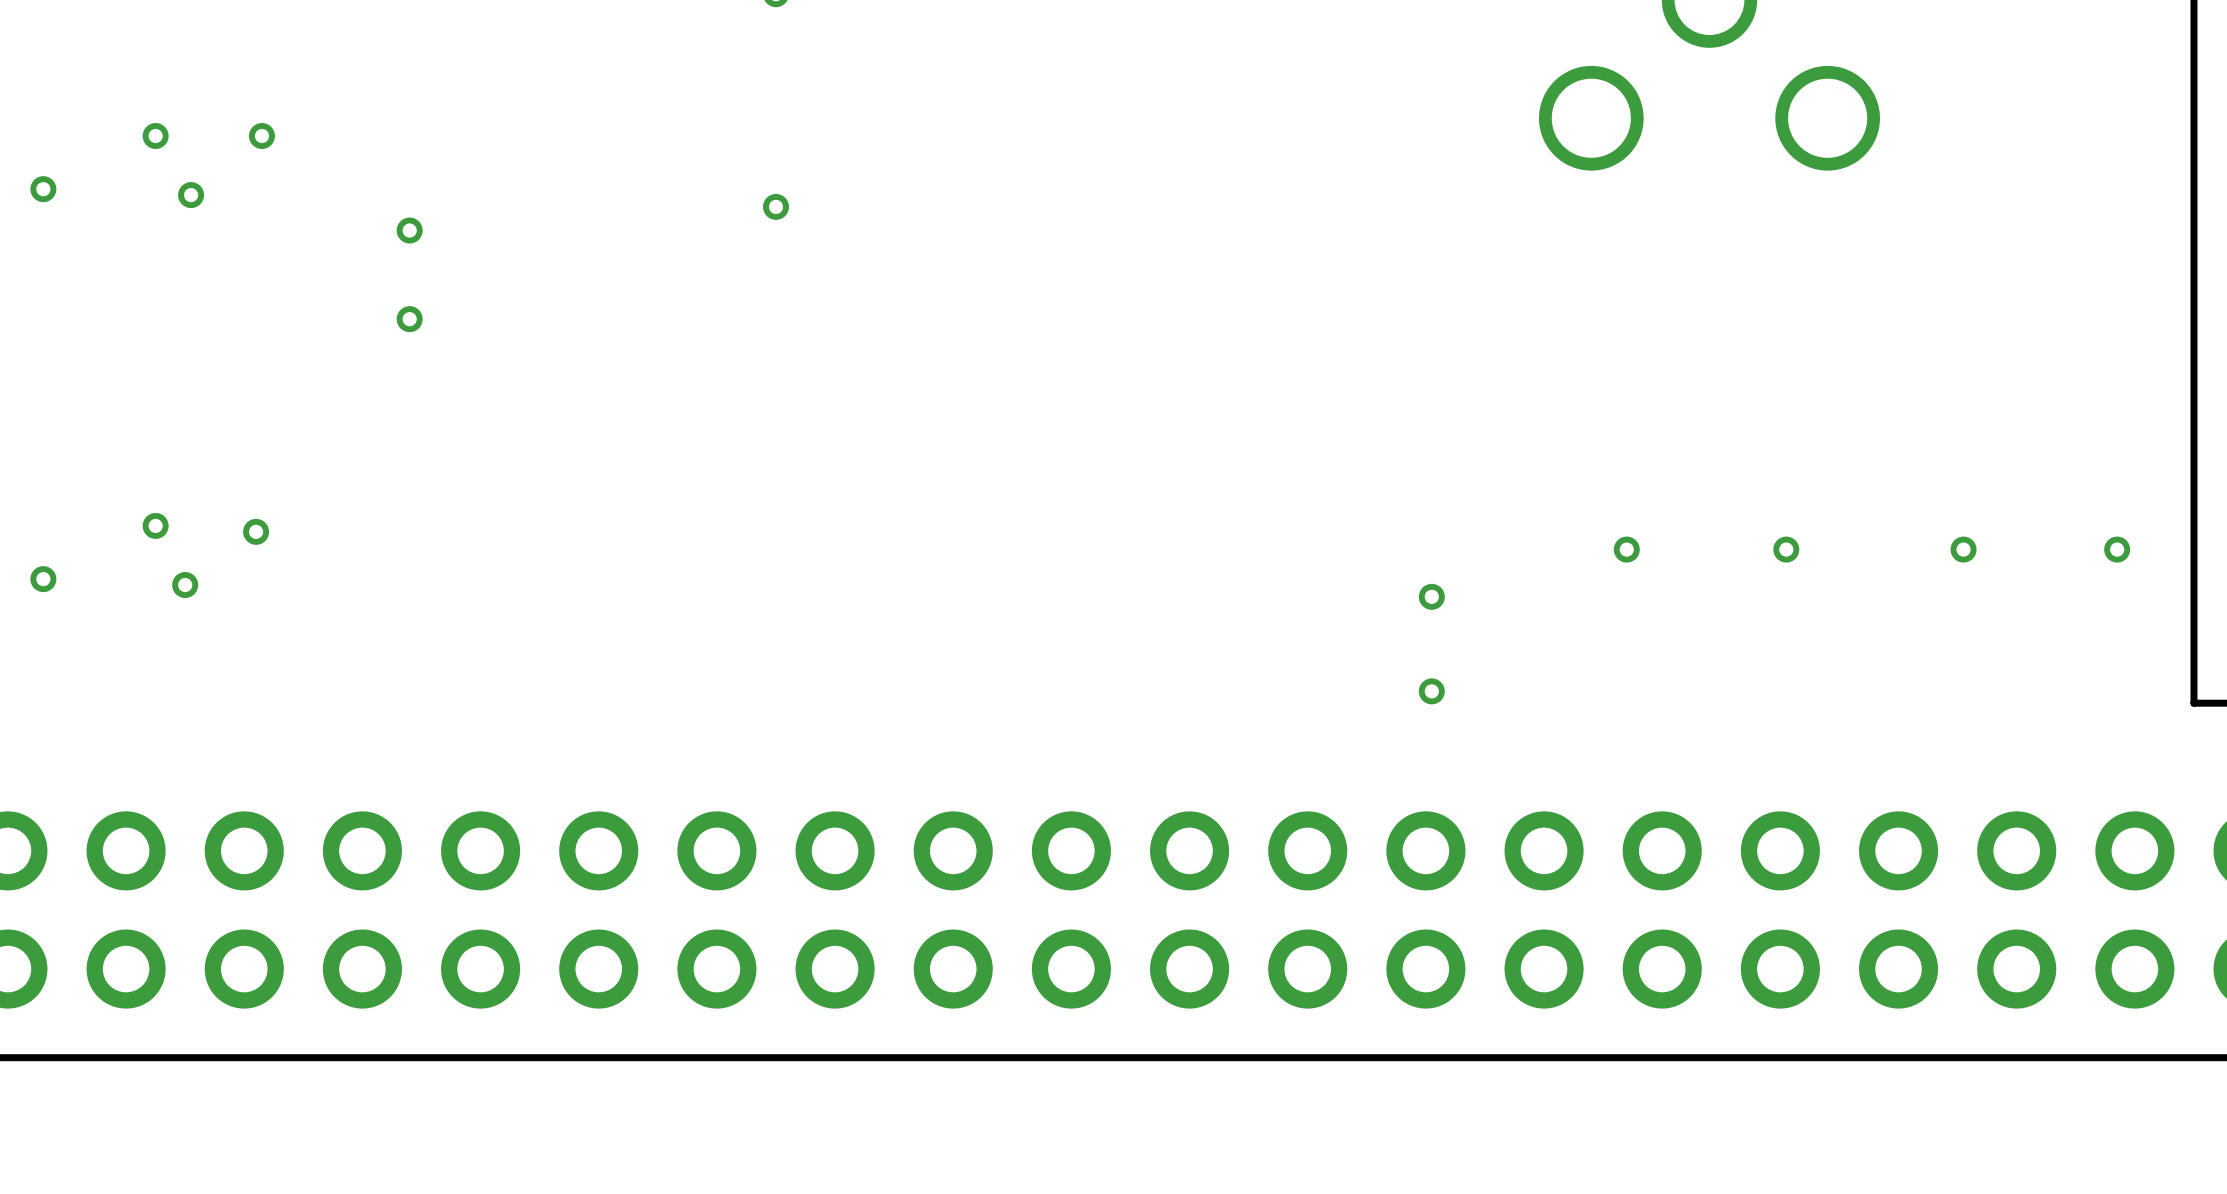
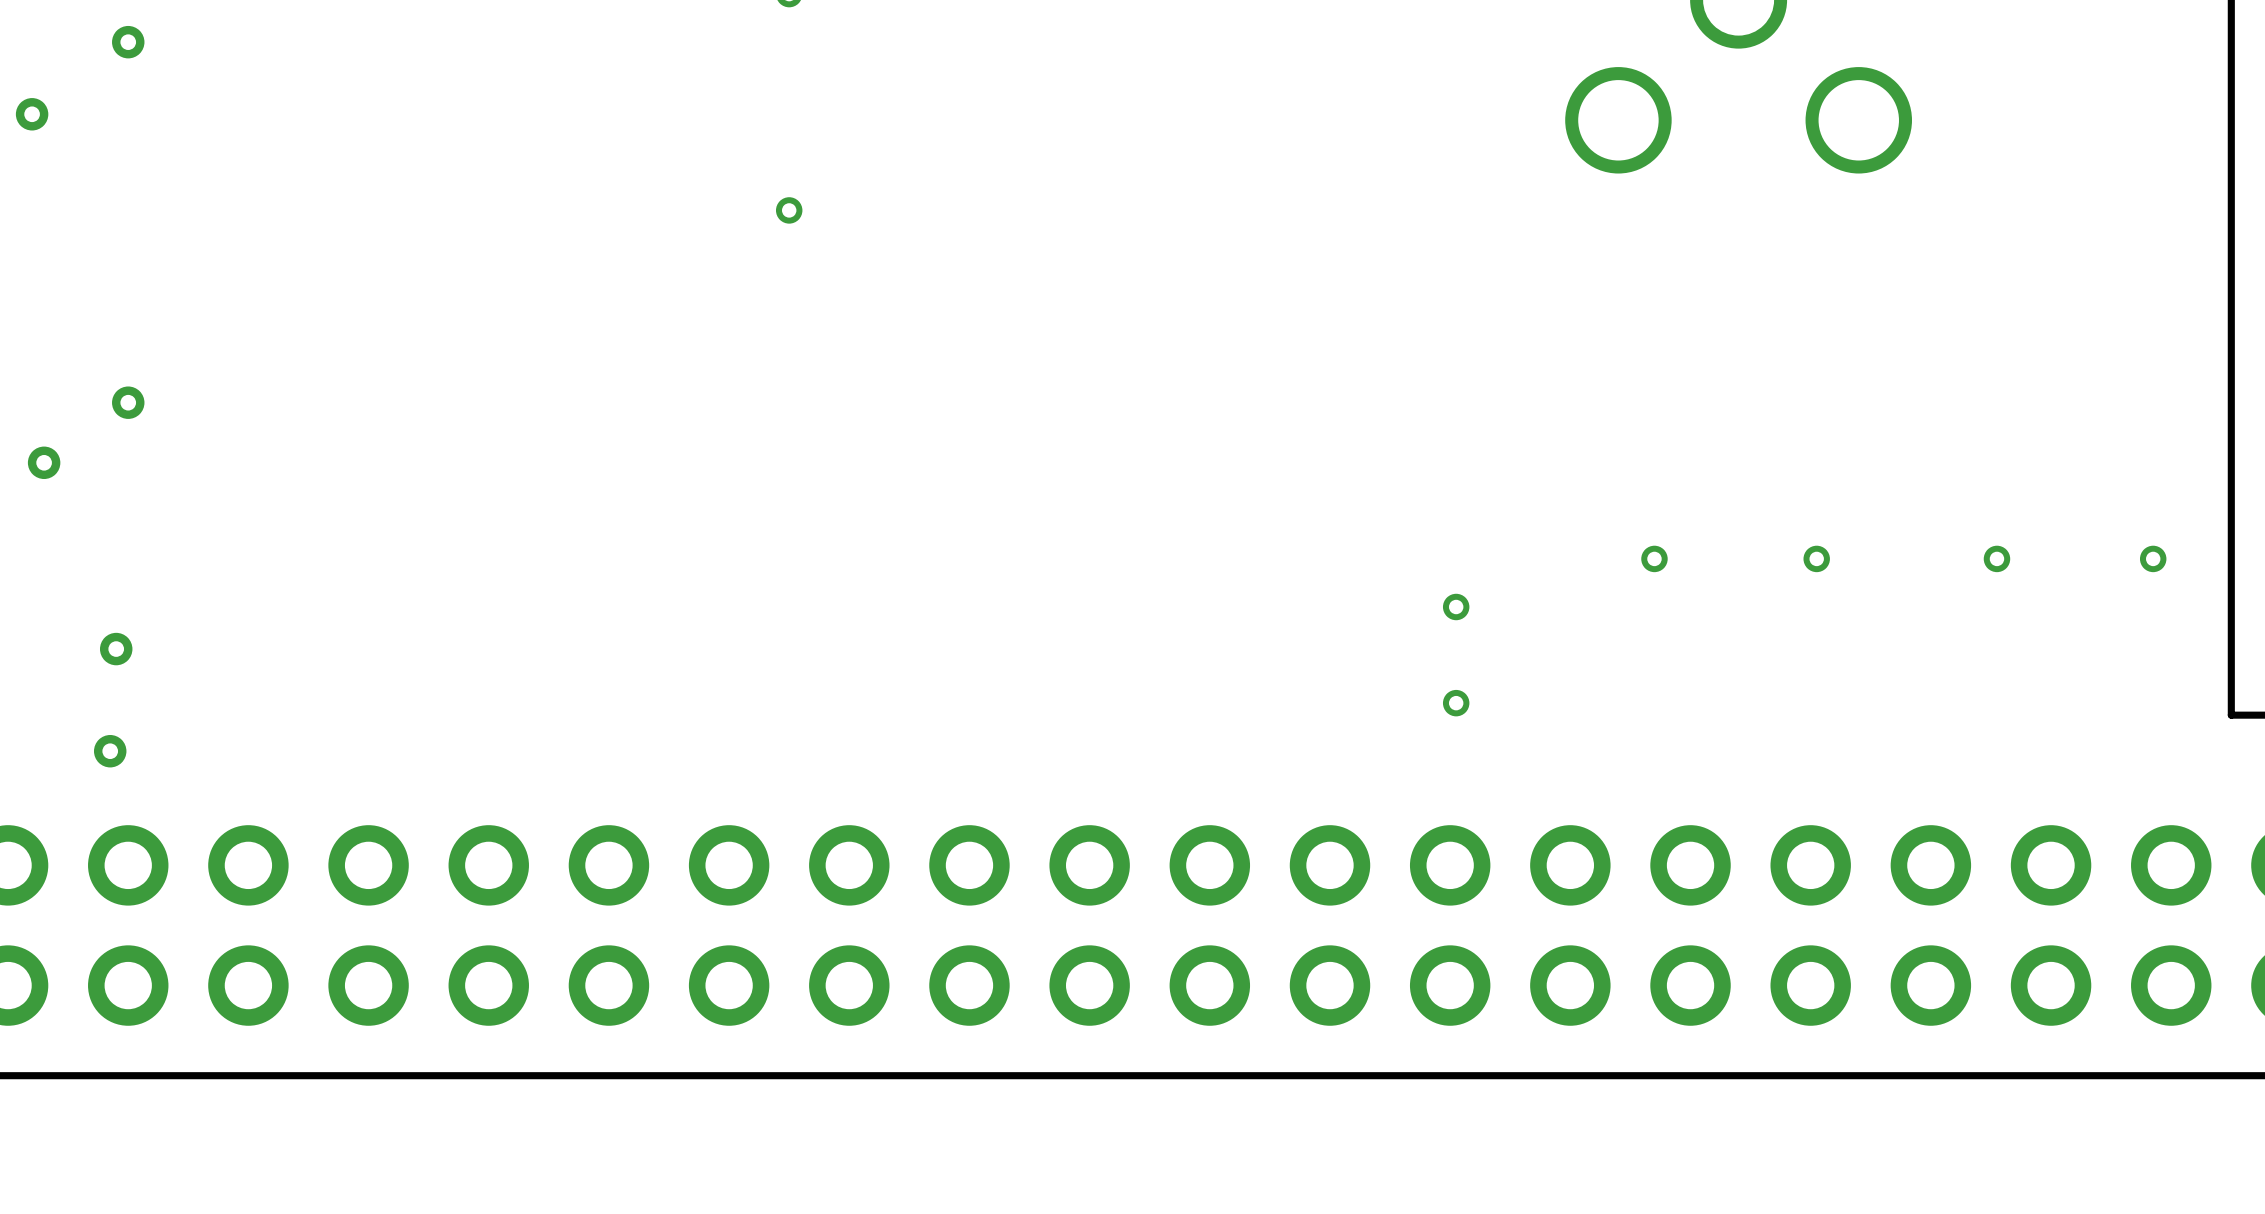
via: none -> (128, 42)
via: none -> (32, 114)
via: (155, 136) -> none
via: (261, 136) -> none
via: (43, 189) -> none
via: (191, 195) -> none
via: (409, 230) -> none
via: (409, 319) -> none
via: none -> (128, 402)
via: none -> (44, 462)
via: (155, 525) -> none
via: (256, 531) -> none
via: (43, 579) -> none
via: (185, 585) -> none
via: none -> (116, 649)
via: none -> (110, 751)

